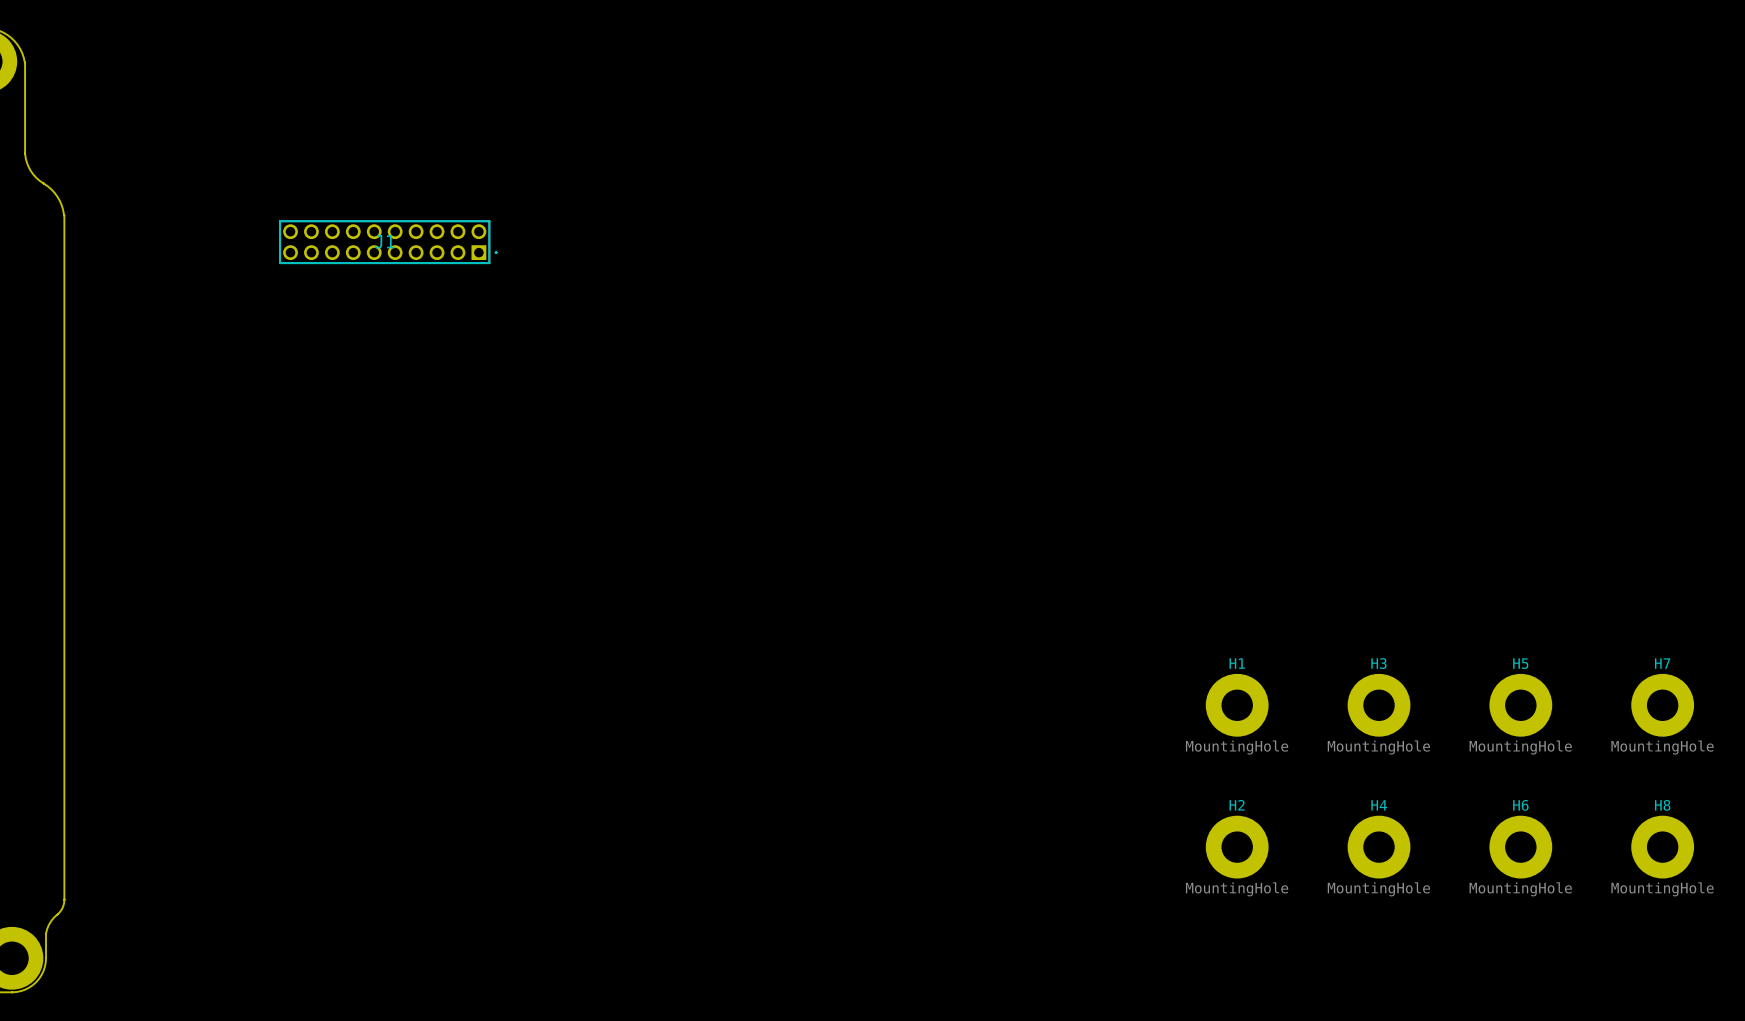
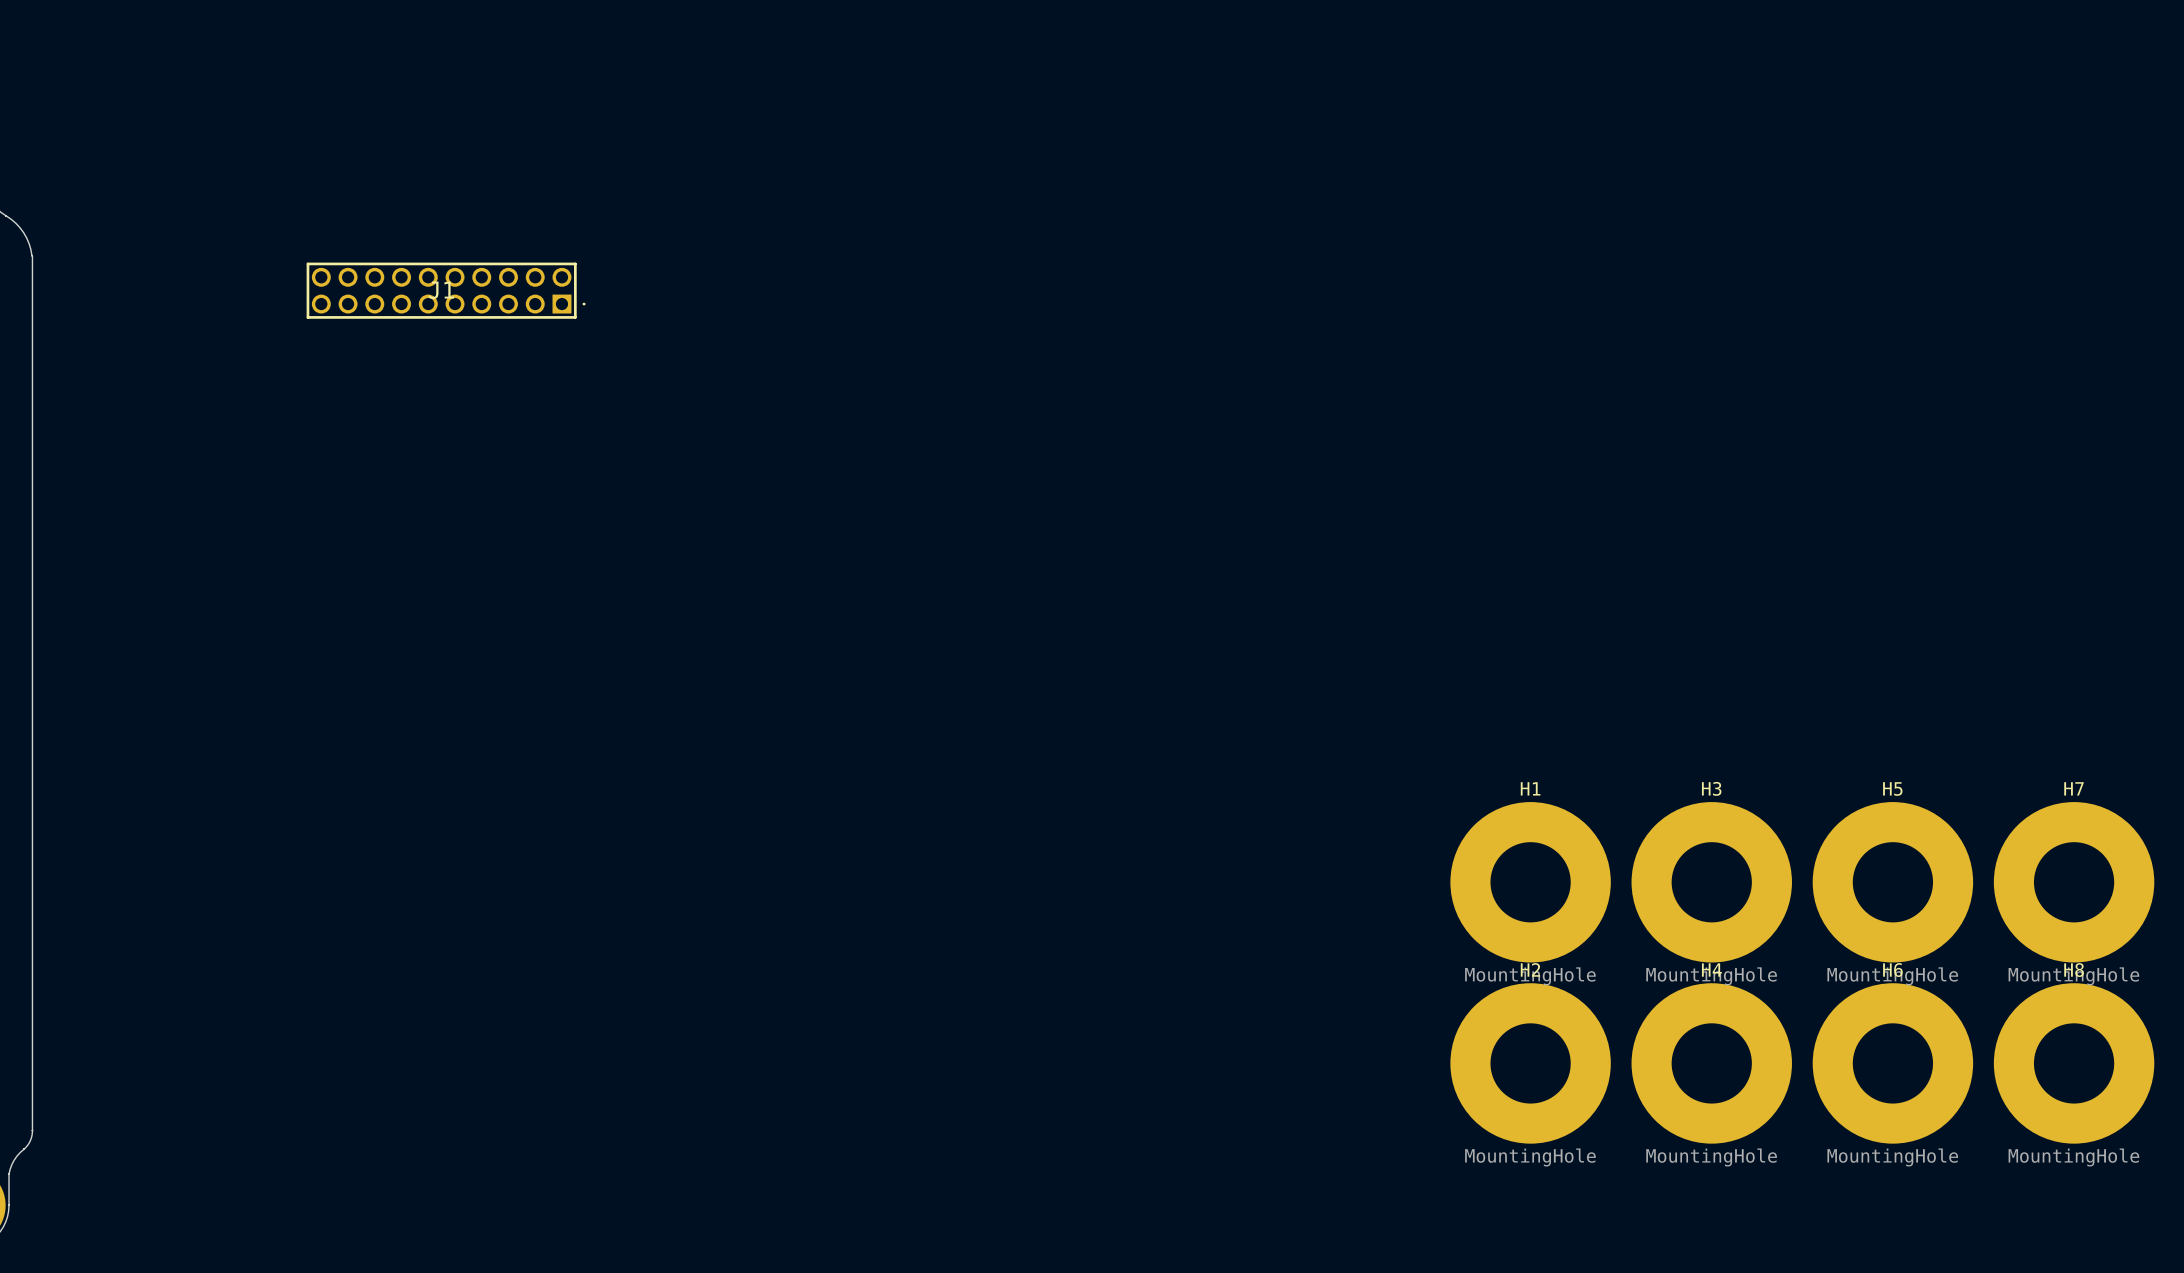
H1 name position: H1 (1237, 663) -> H1 (1530, 788)
H3 name position: H3 (1378, 663) -> H3 (1711, 788)
H5 name position: H5 (1520, 663) -> H5 (1892, 788)
H7 name position: H7 (1662, 663) -> H7 (2073, 788)
H1 footprint: [1205, 673, 1269, 737] -> [1450, 802, 1611, 963]
H3 footprint: [1347, 673, 1411, 737] -> [1631, 802, 1792, 963]
H5 footprint: [1489, 673, 1553, 737] -> [1812, 802, 1974, 963]
H7 footprint: [1631, 673, 1695, 737] -> [1993, 802, 2155, 963]
H1 value position: MountingHole (1237, 747) -> MountingHole (1530, 976)
H3 value position: MountingHole (1378, 747) -> MountingHole (1711, 976)
H5 value position: MountingHole (1520, 747) -> MountingHole (1892, 976)
H7 value position: MountingHole (1662, 747) -> MountingHole (2073, 976)
H2 name position: H2 (1237, 805) -> H2 (1530, 969)
H4 name position: H4 (1379, 805) -> H4 (1711, 970)
H6 name position: H6 (1520, 805) -> H6 (1892, 970)
H8 name position: H8 (1662, 805) -> H8 (2074, 970)
H2 footprint: [1205, 815, 1269, 879] -> [1450, 983, 1611, 1144]
H4 footprint: [1347, 815, 1411, 879] -> [1631, 983, 1792, 1144]
H6 footprint: [1489, 815, 1553, 879] -> [1812, 983, 1974, 1144]
H8 footprint: [1631, 815, 1695, 879] -> [1993, 983, 2155, 1144]
H2 value position: MountingHole (1237, 889) -> MountingHole (1530, 1157)
H4 value position: MountingHole (1378, 889) -> MountingHole (1711, 1157)
H6 value position: MountingHole (1520, 889) -> MountingHole (1892, 1157)
H8 value position: MountingHole (1662, 889) -> MountingHole (2073, 1157)

